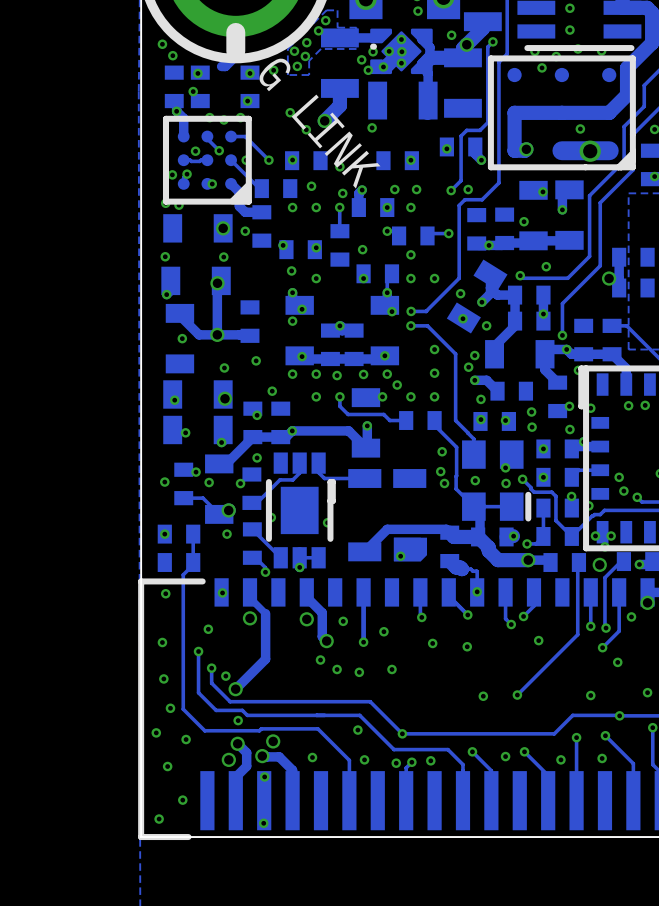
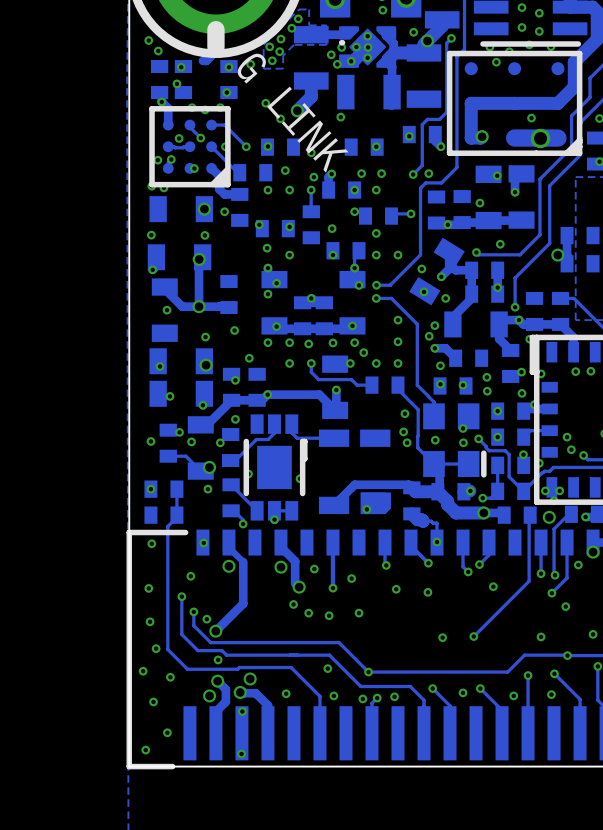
via: none -> (539, 13)
via: none -> (539, 31)

